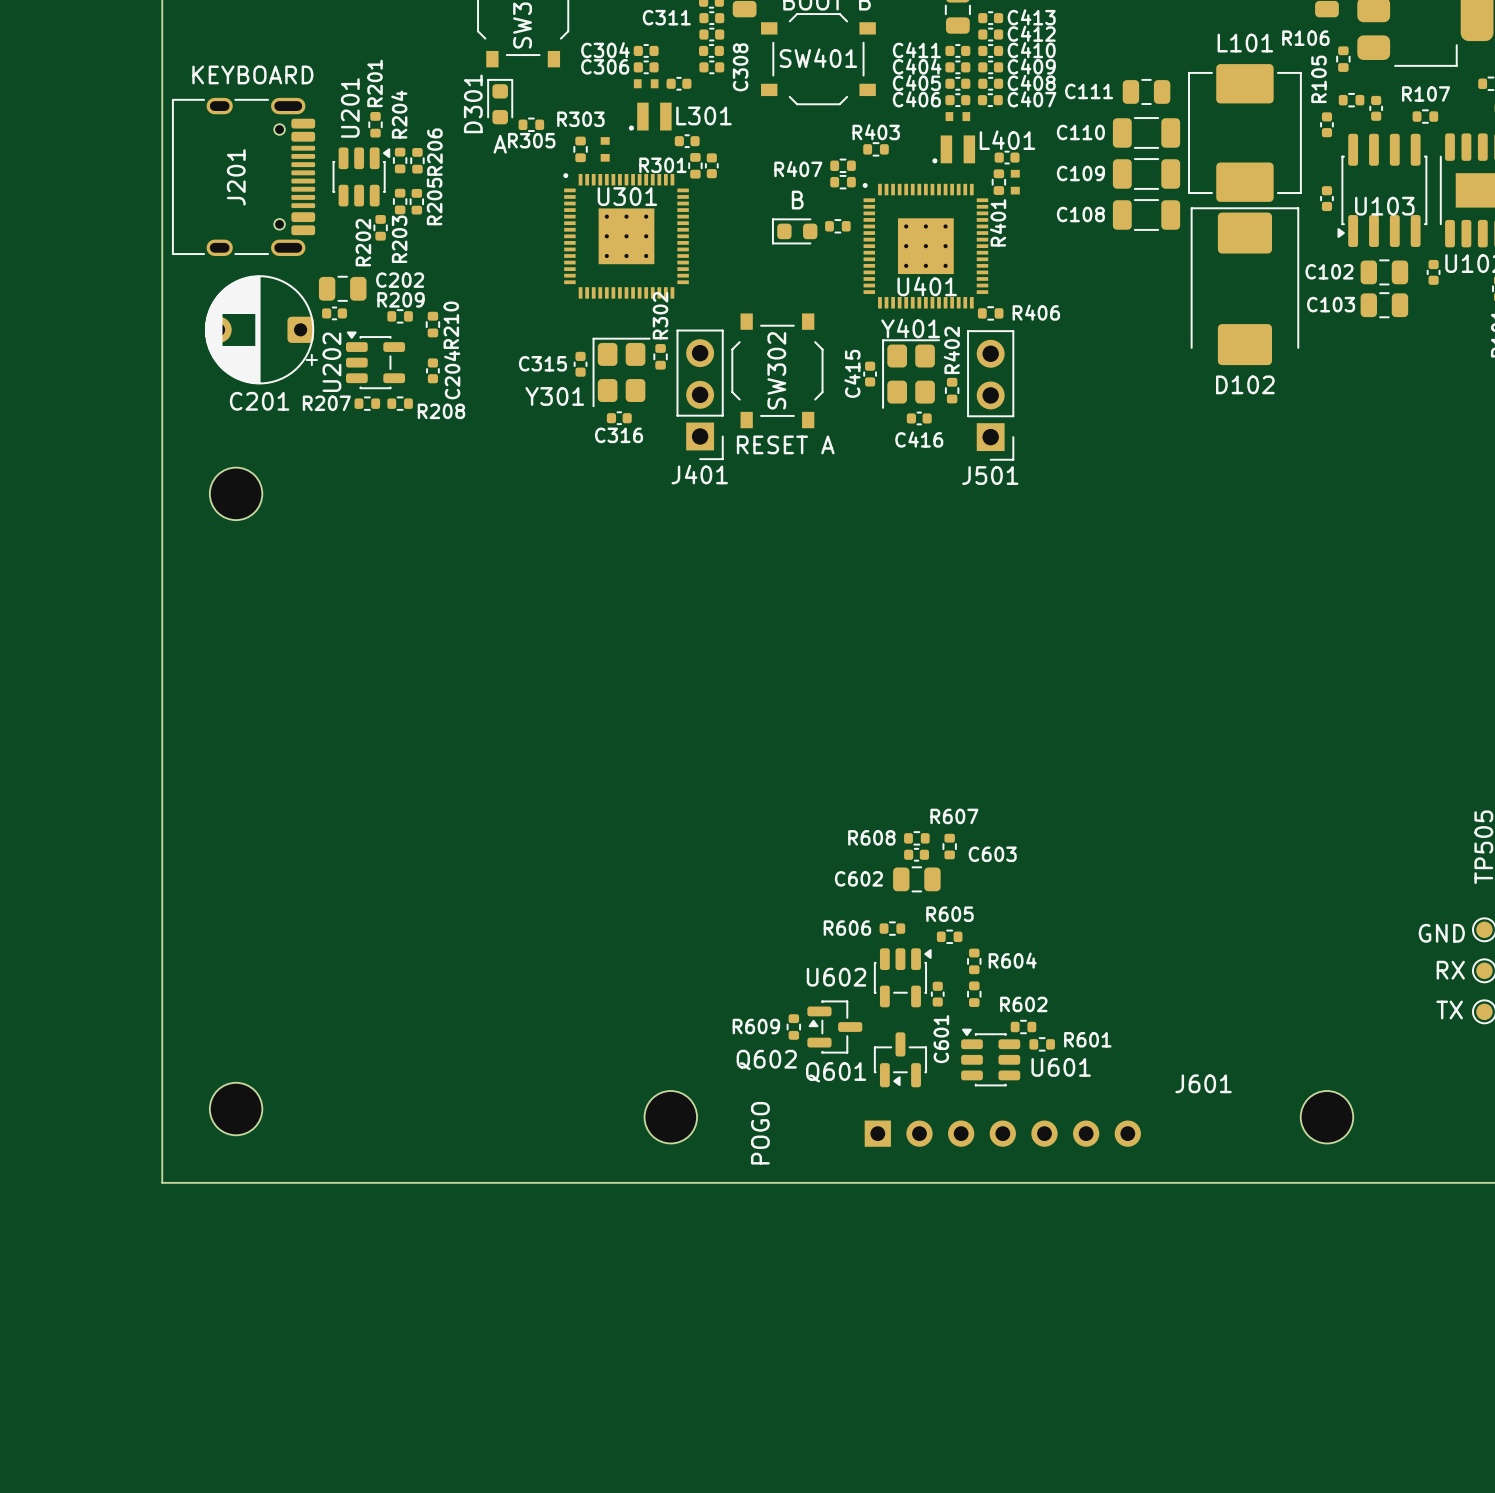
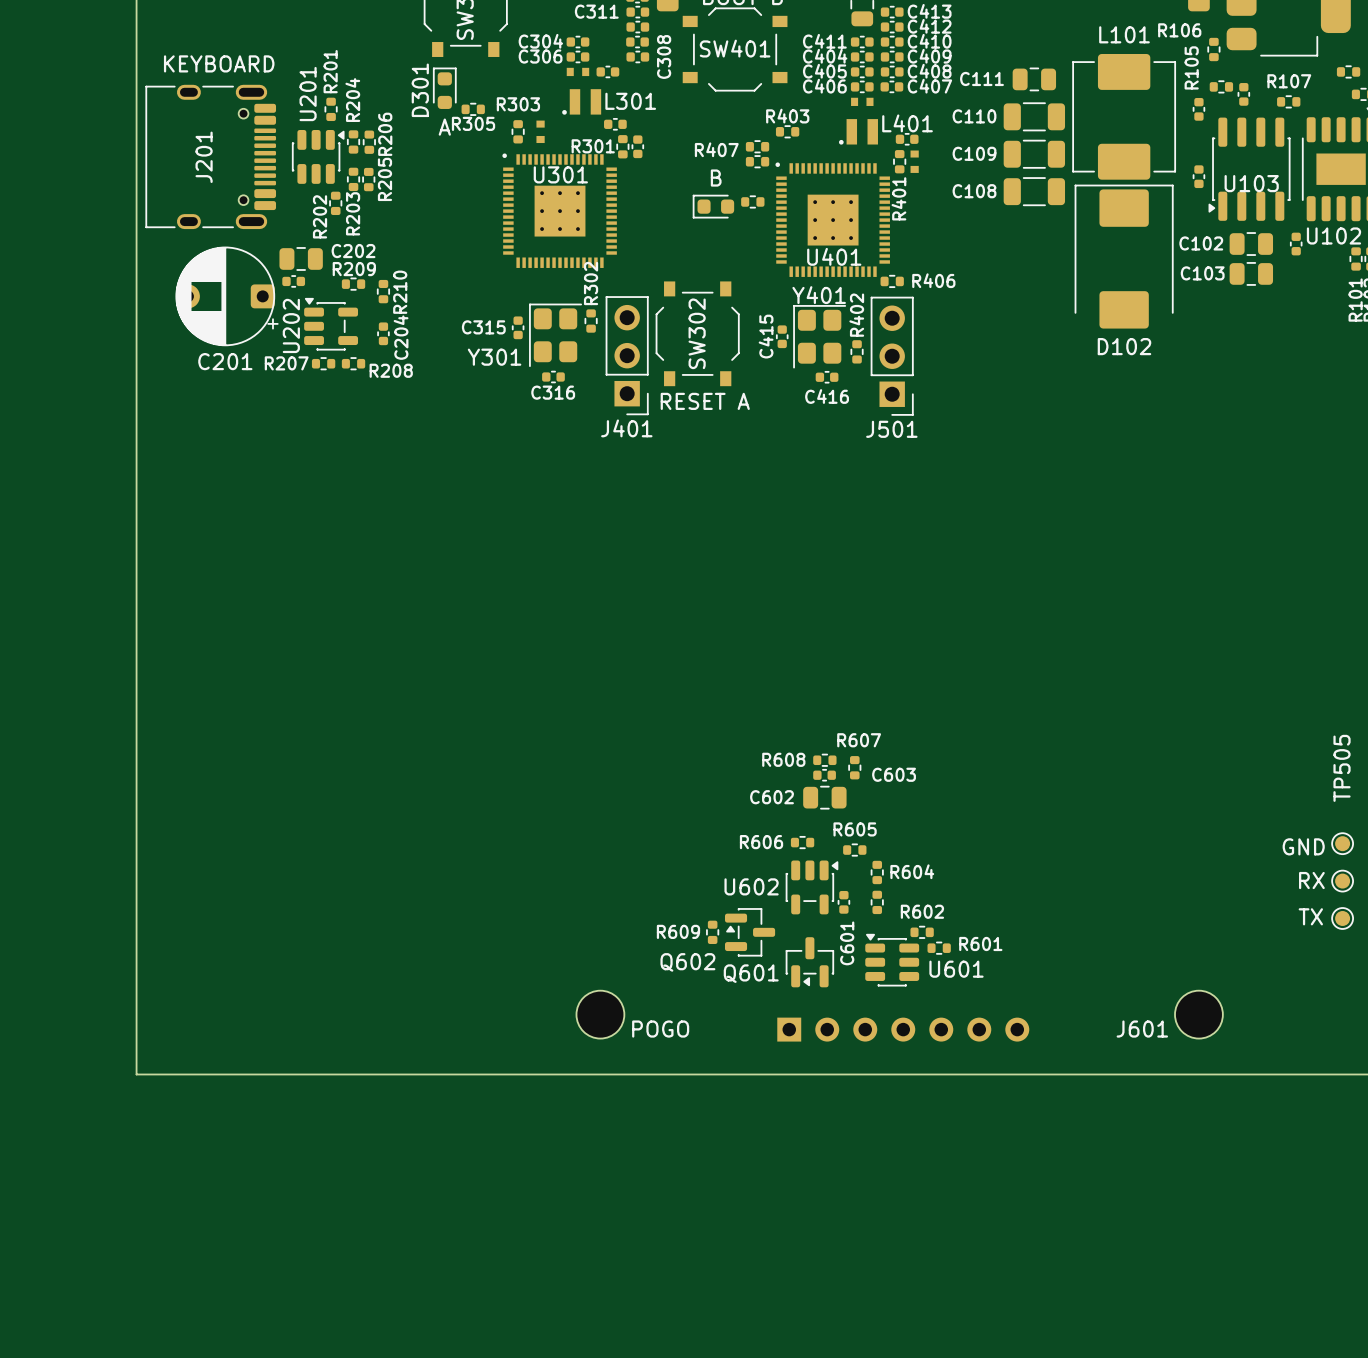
part: (236, 493) -> none
J601 name position: J601 (1203, 1083) -> J601 (1142, 1029)
part: (236, 1109) -> none
text rotation: 0° (760, 1133) -> 90° clockwise (660, 1029)

